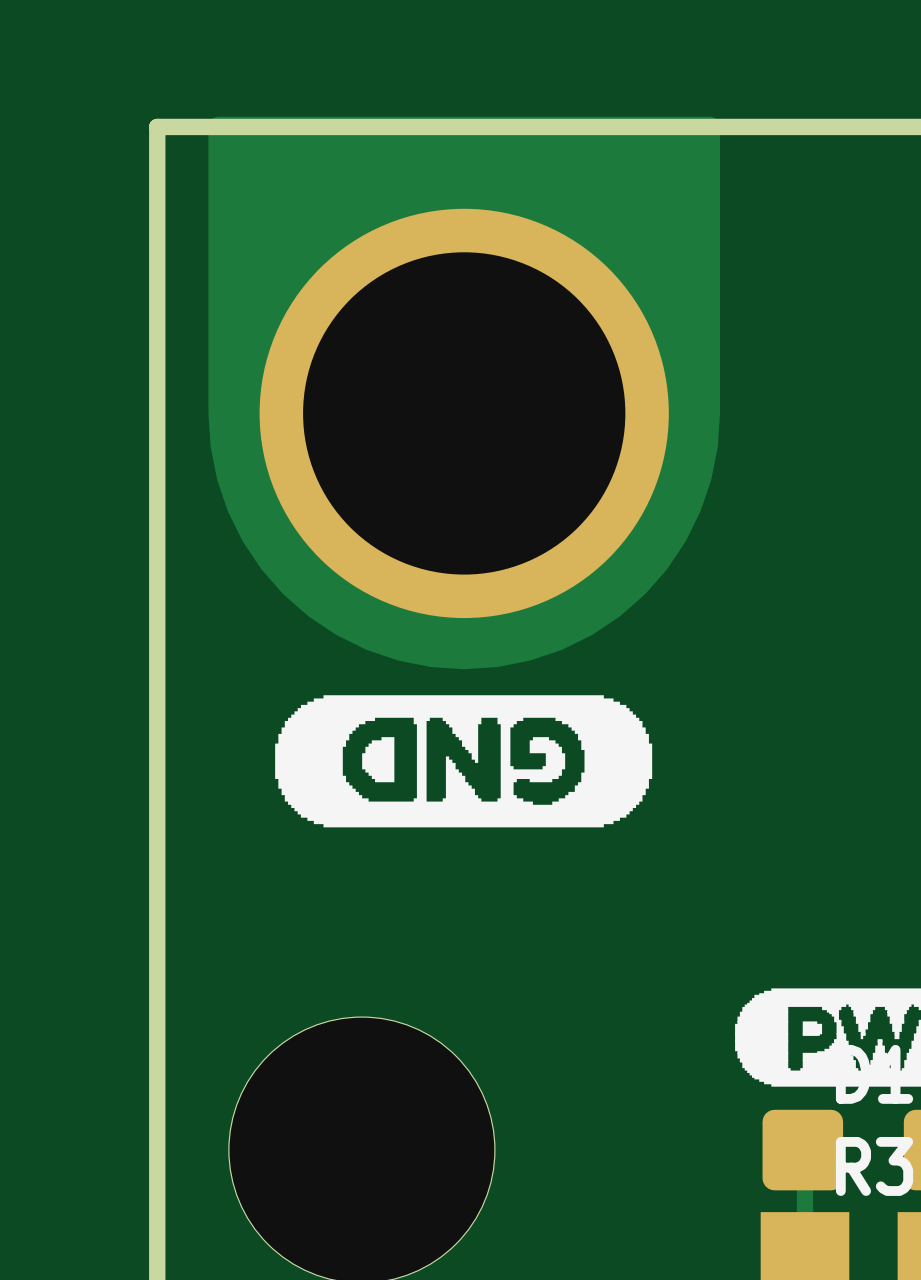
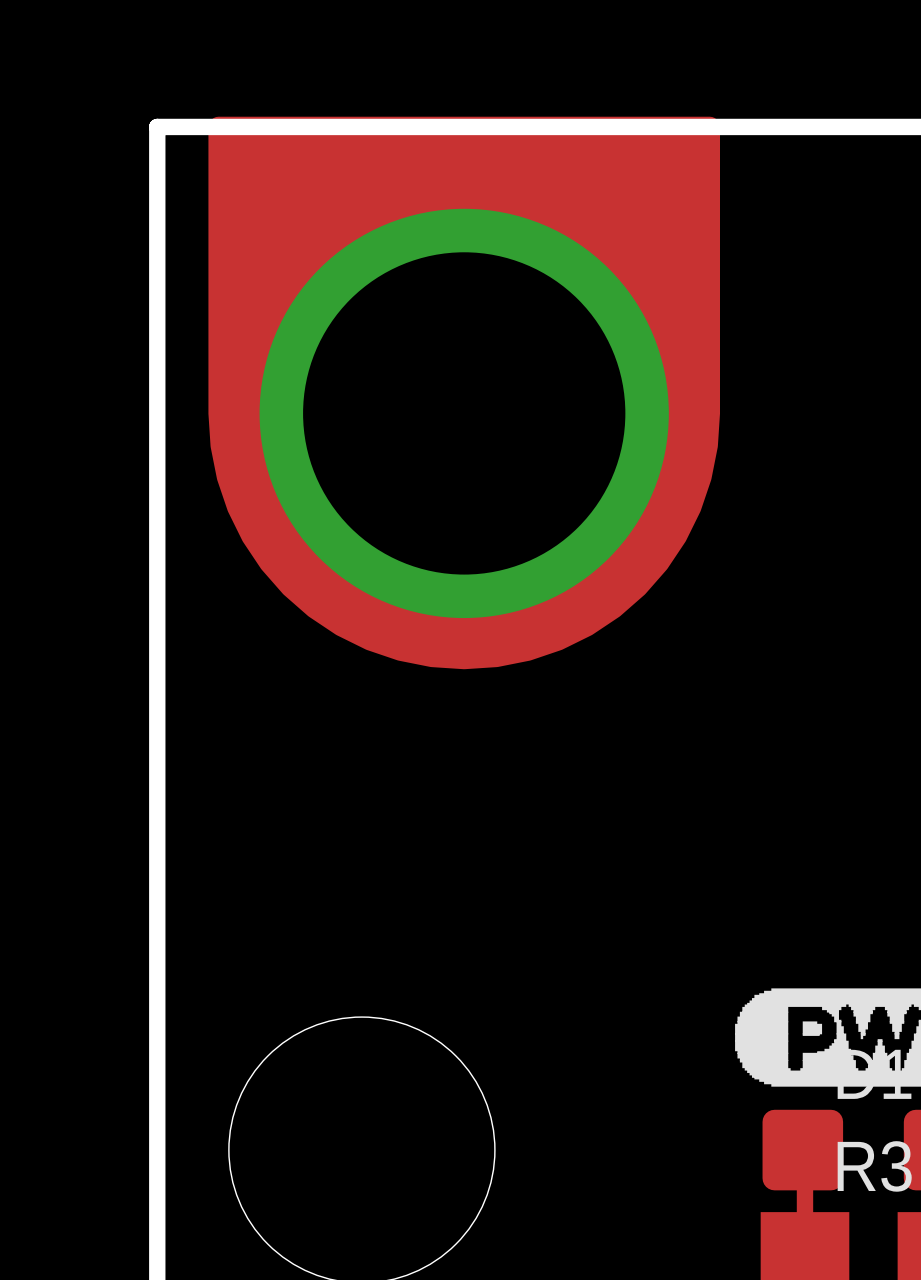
drawing: [275, 695, 653, 828] -> none

